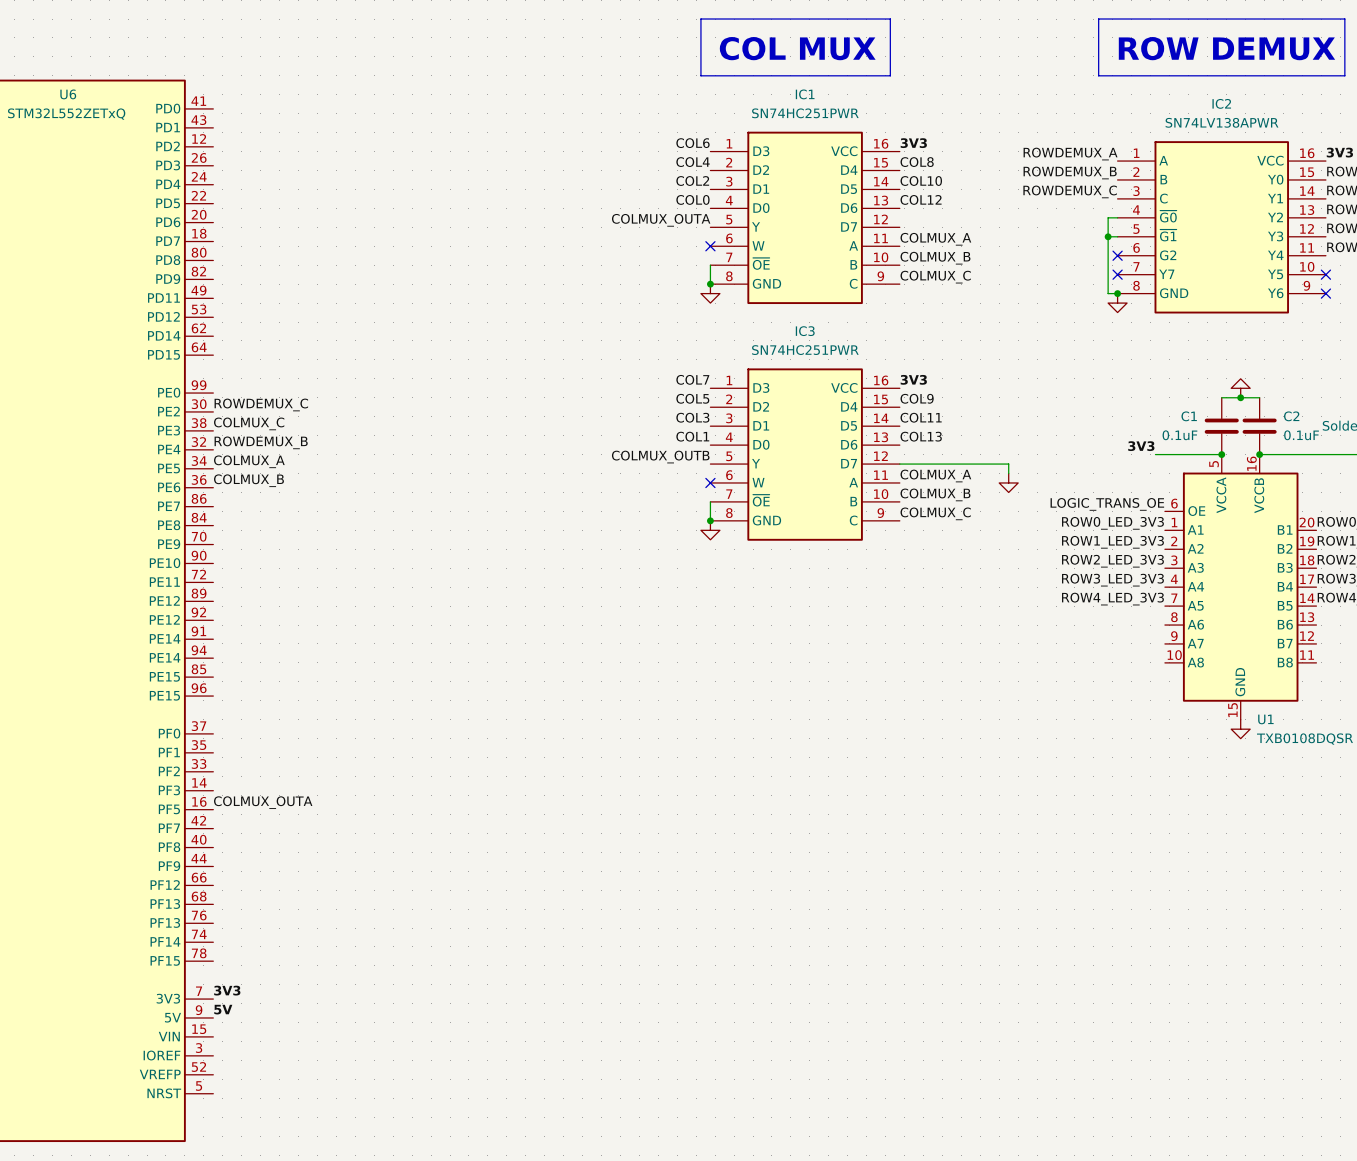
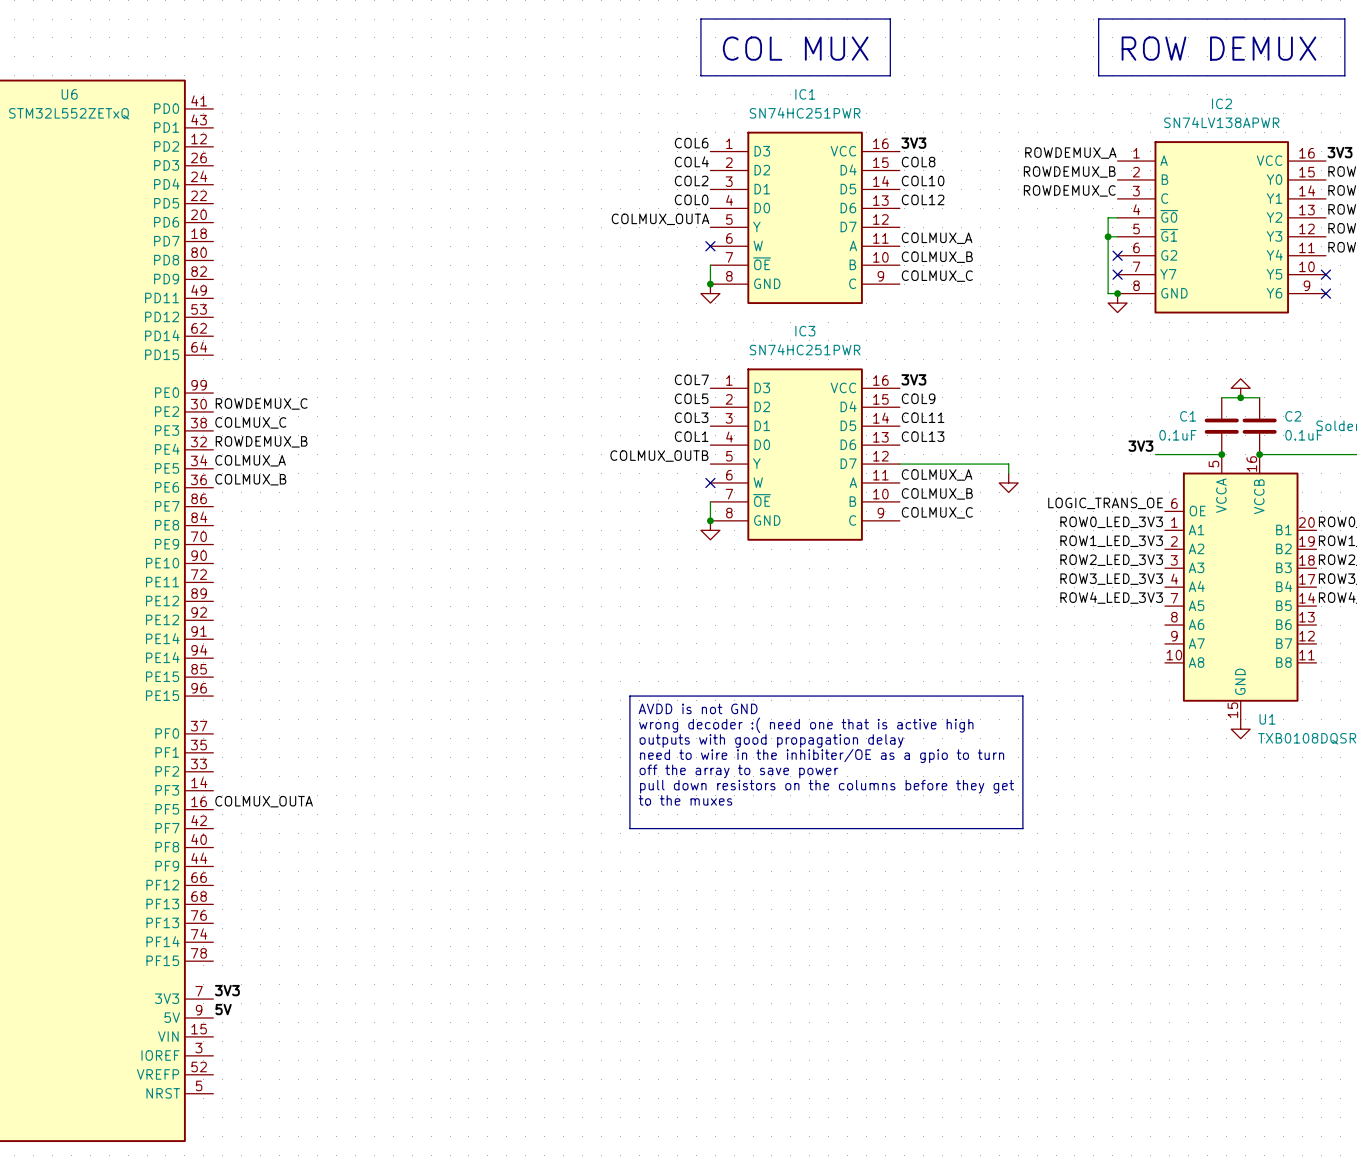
line: none -> (629, 696) (1022, 696) (1022, 828) (629, 828) (629, 696)
text: none -> AVDD is not GND (698, 708)
text: none -> wrong decoder :( need one that is active high (806, 725)
text: none -> outputs with good propagation delay (771, 740)
text: none -> need to wire in the inhibiter/OE as a gpio to turn (822, 755)
text: none -> off the array to save power (738, 771)
text: none -> pull down resistors on the columns before they get (827, 786)
text: none -> to the muxes (685, 800)

